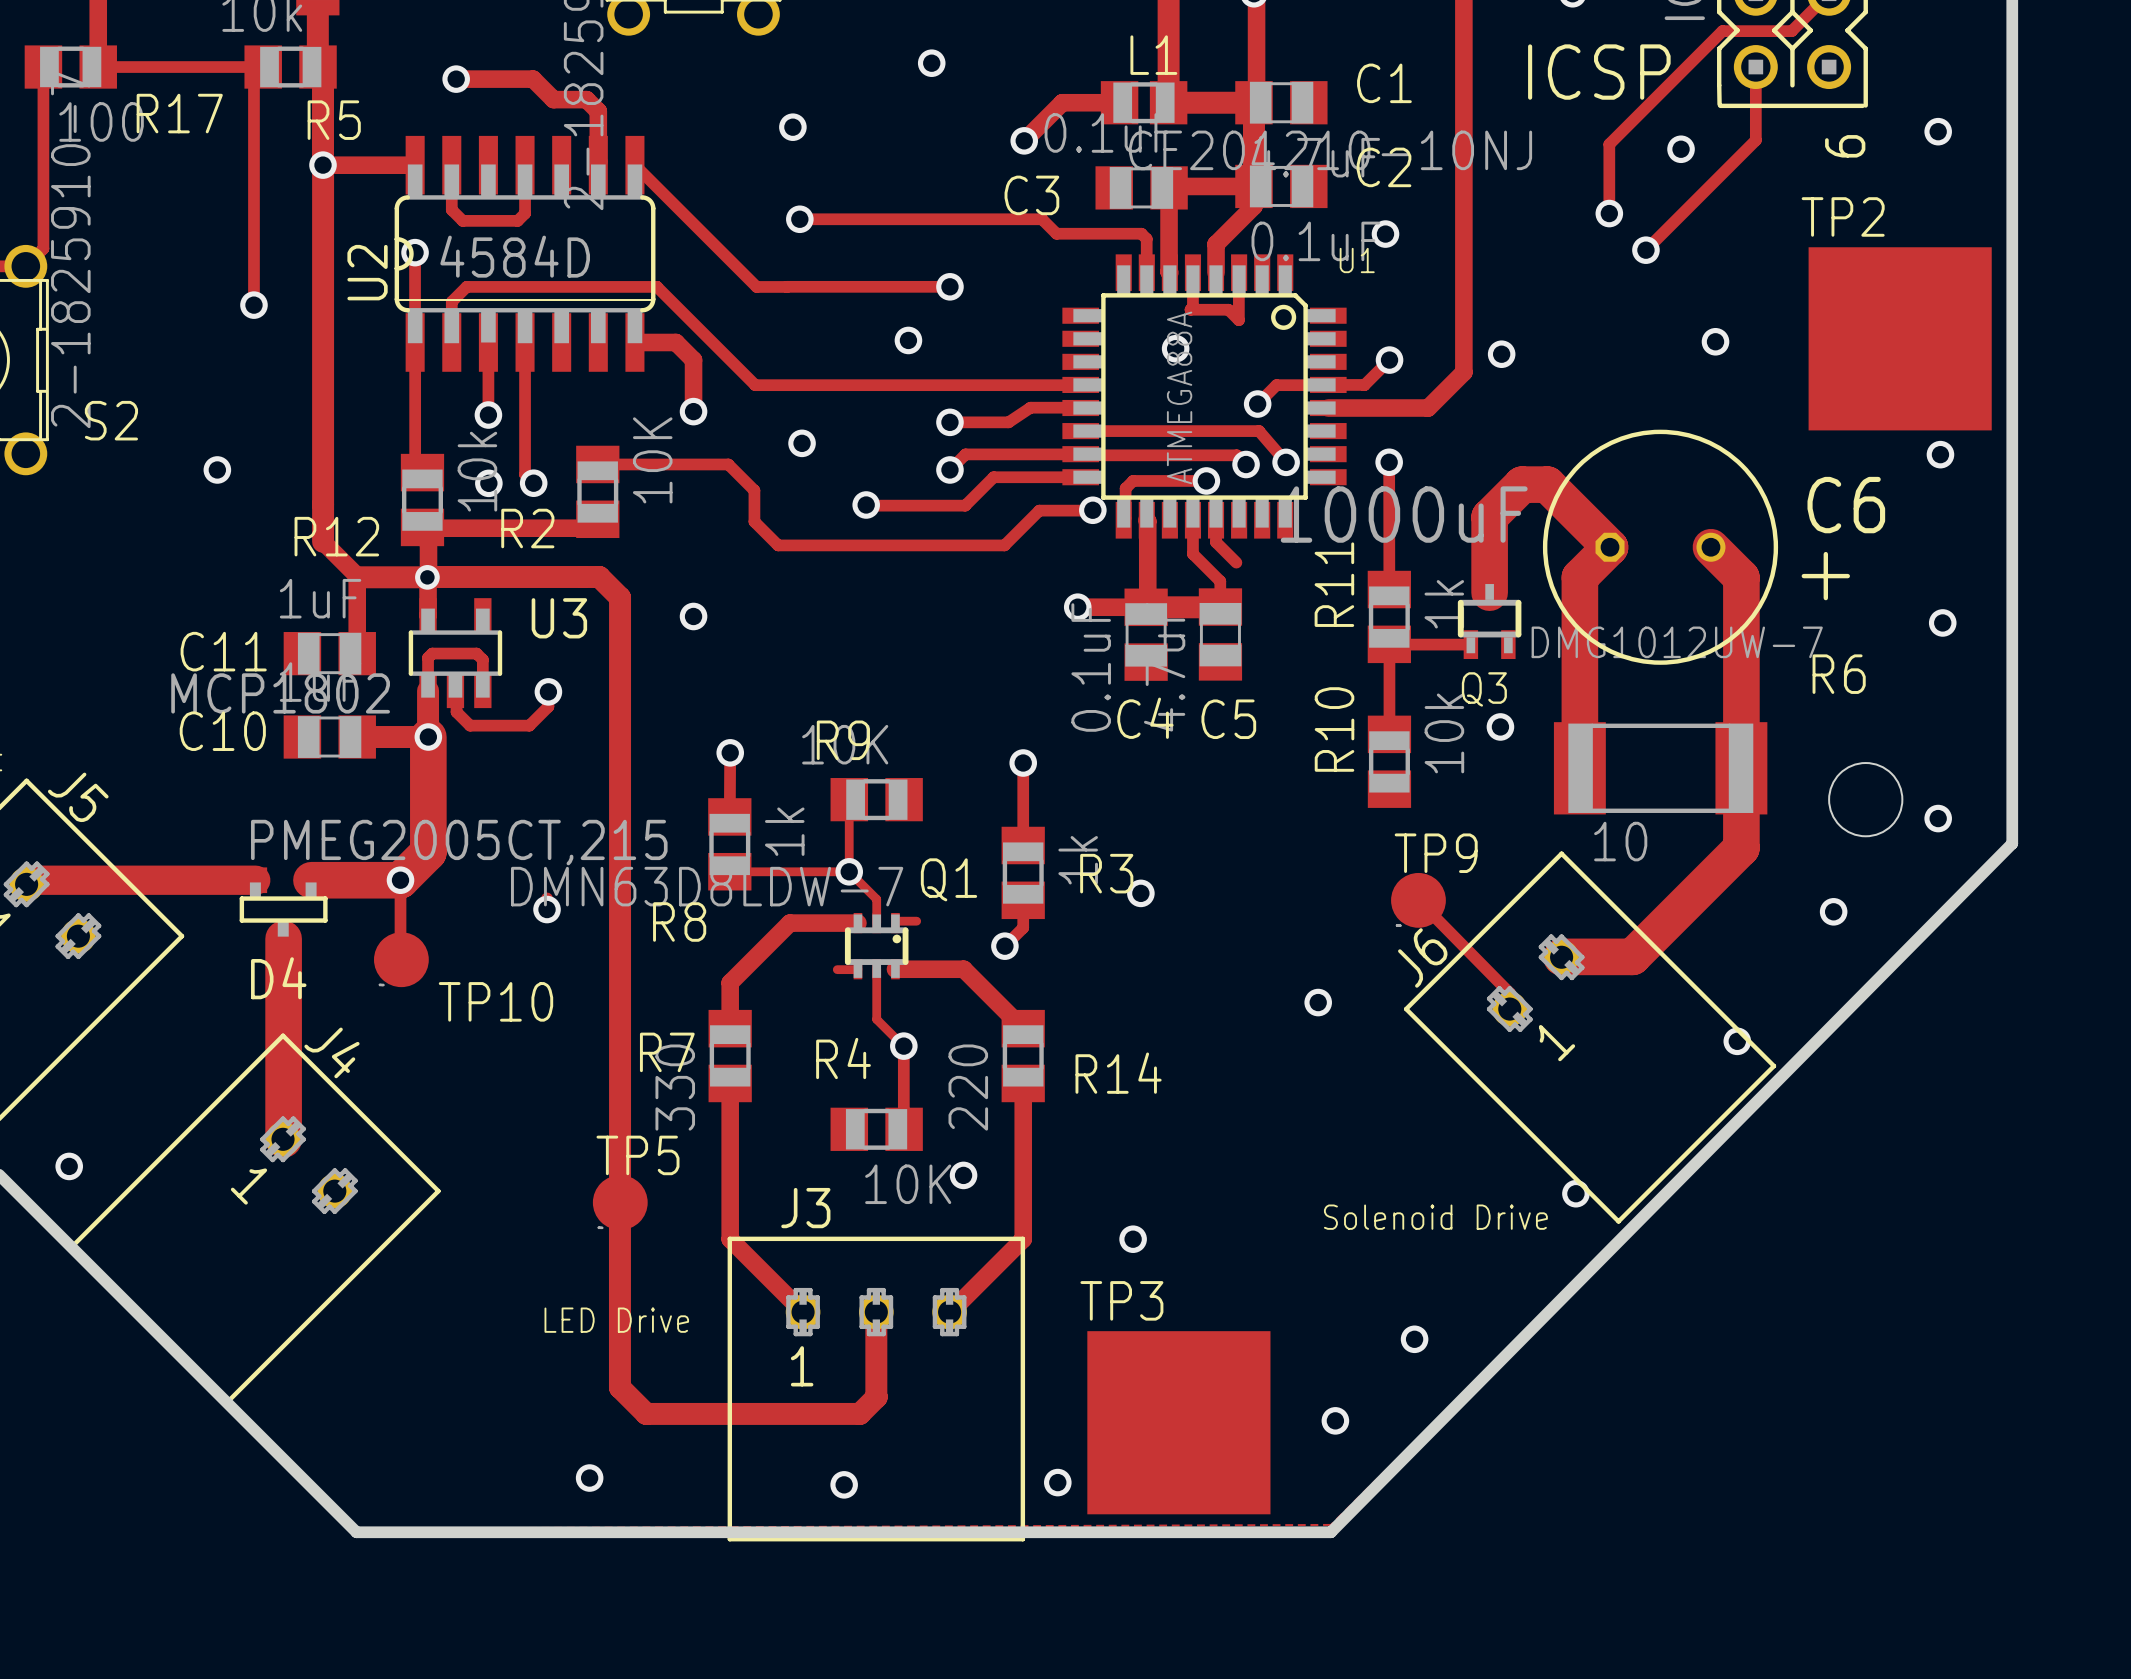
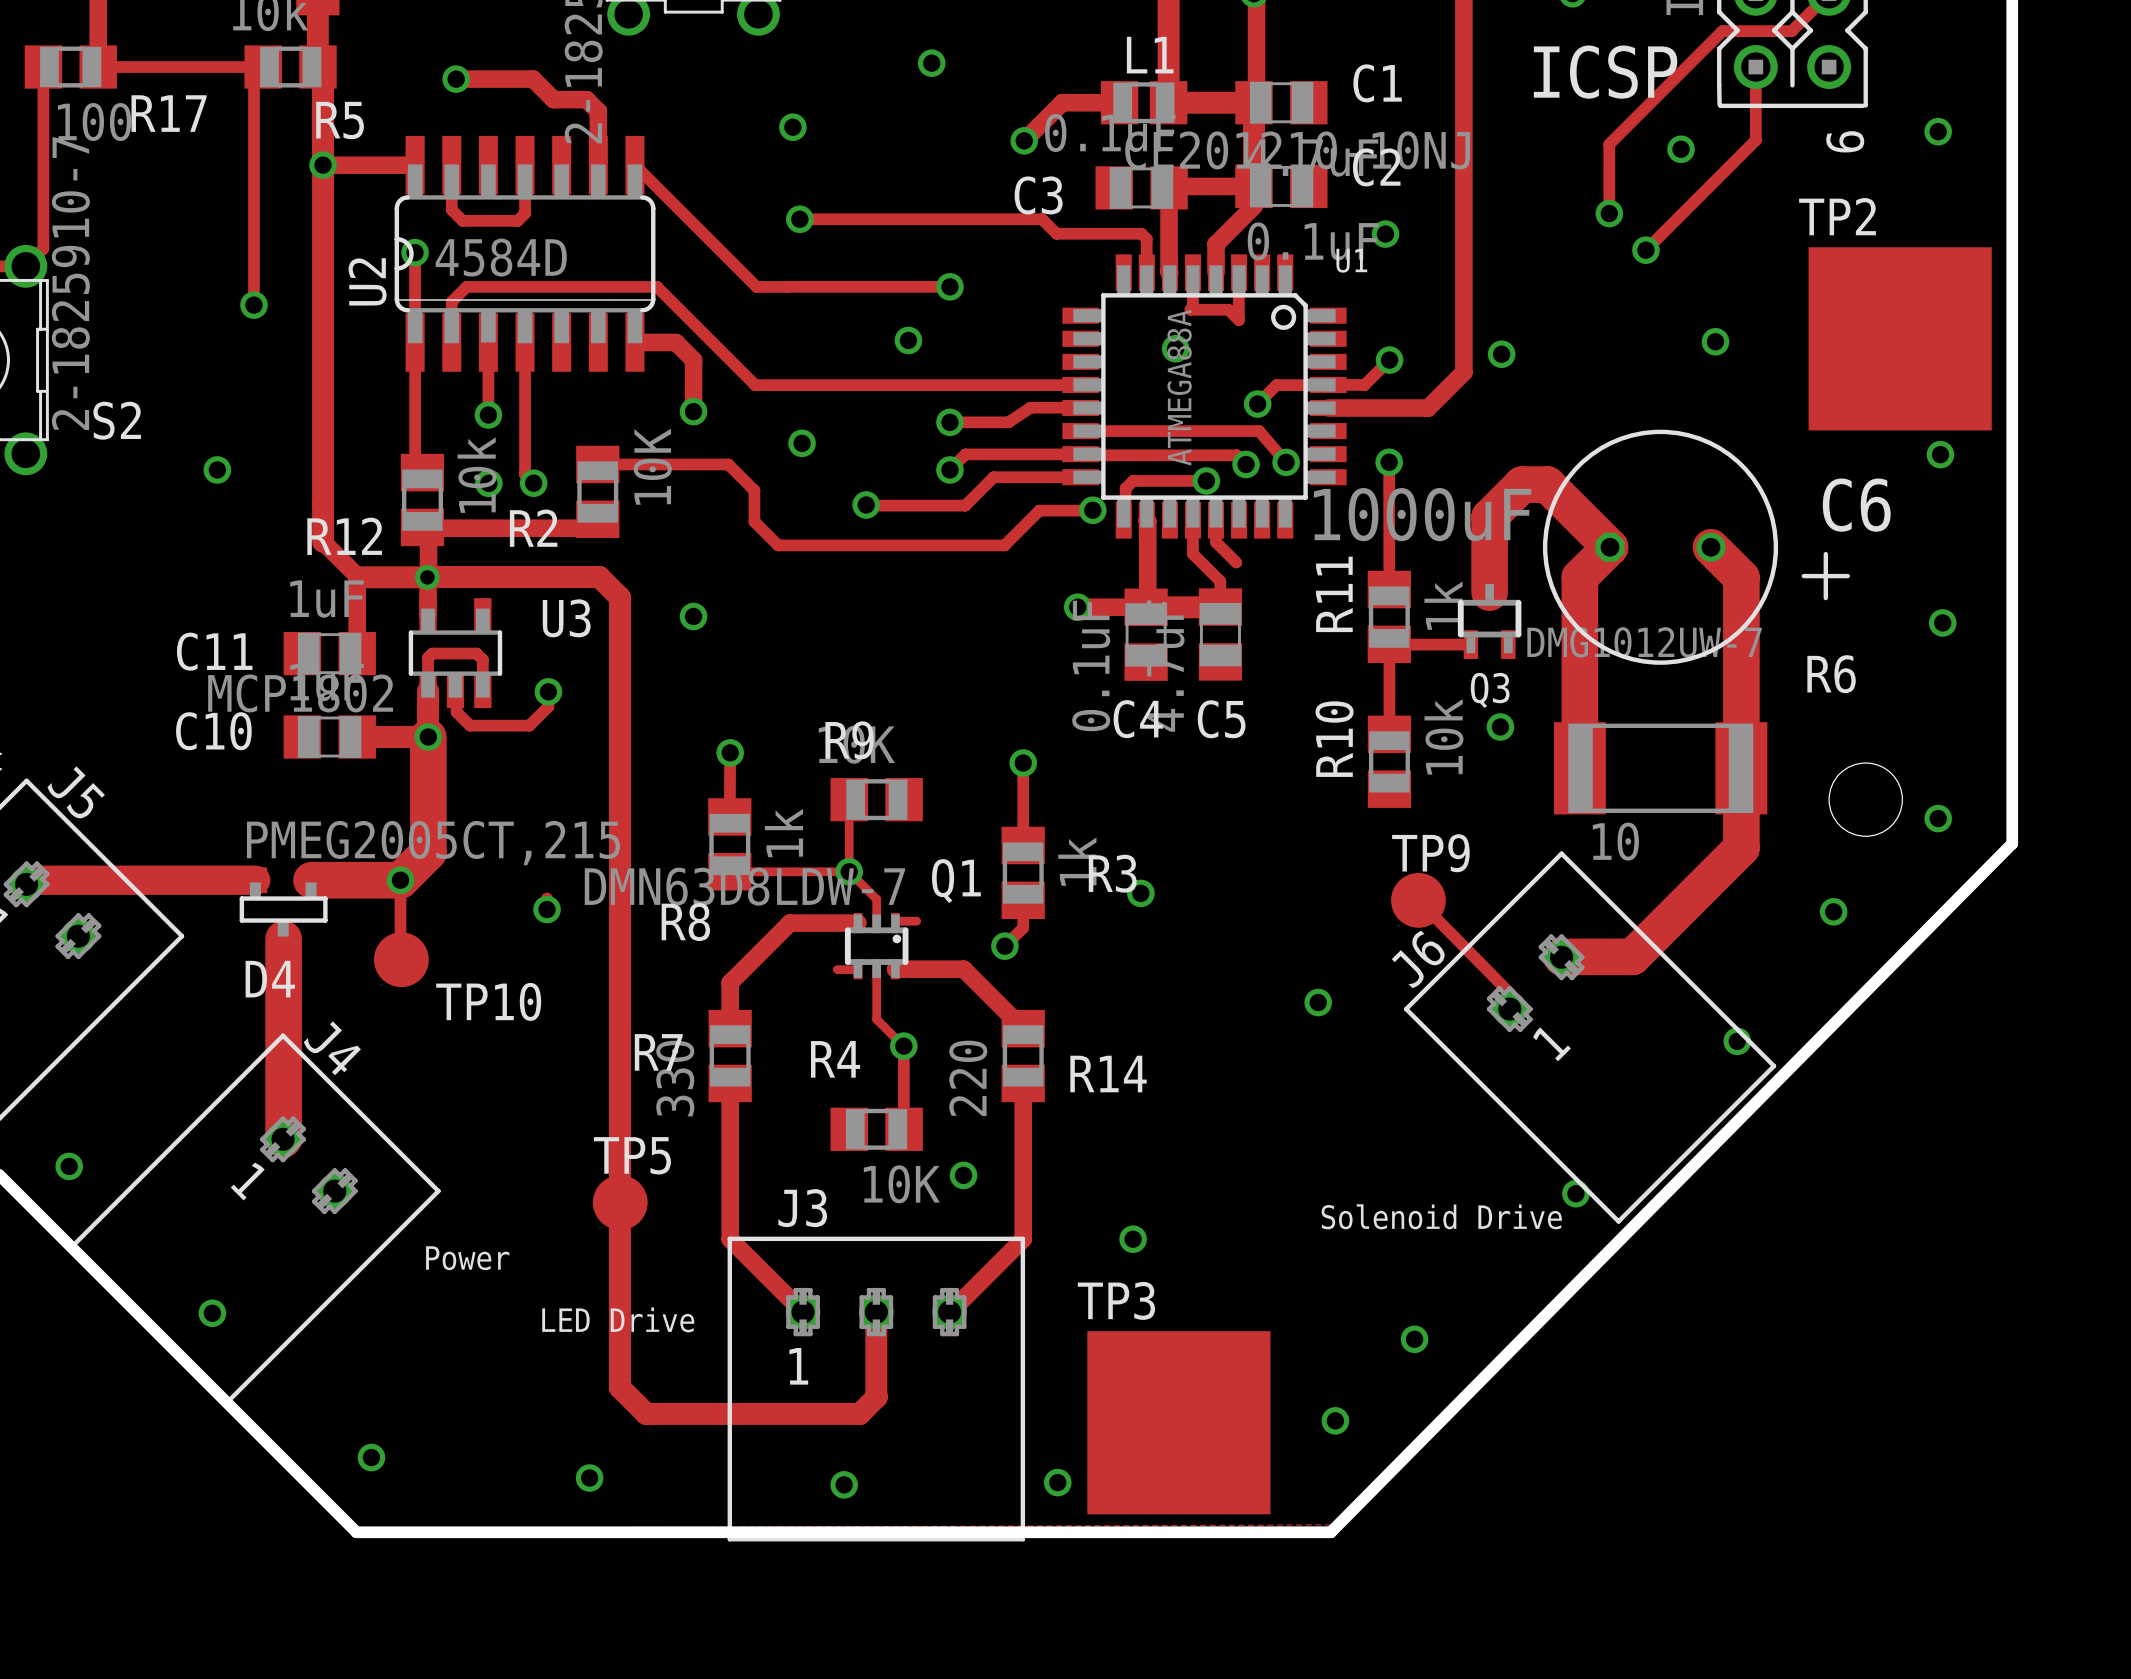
text: none -> Power (467, 1258)
via: none -> (212, 1313)
via: none -> (371, 1457)

